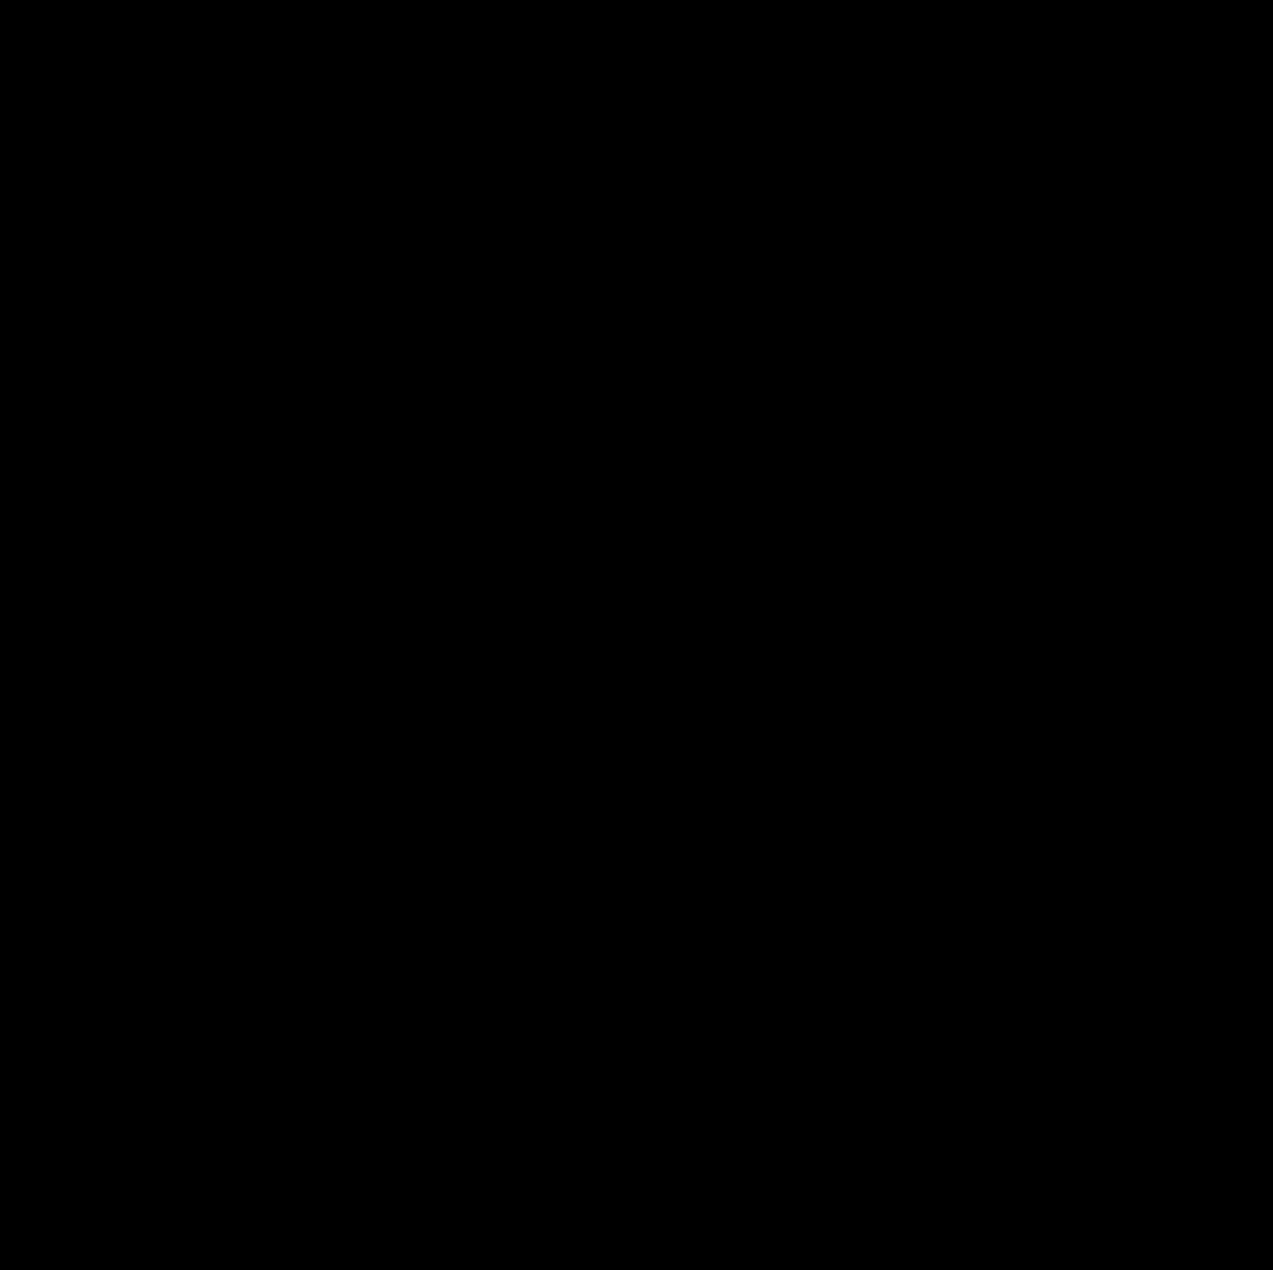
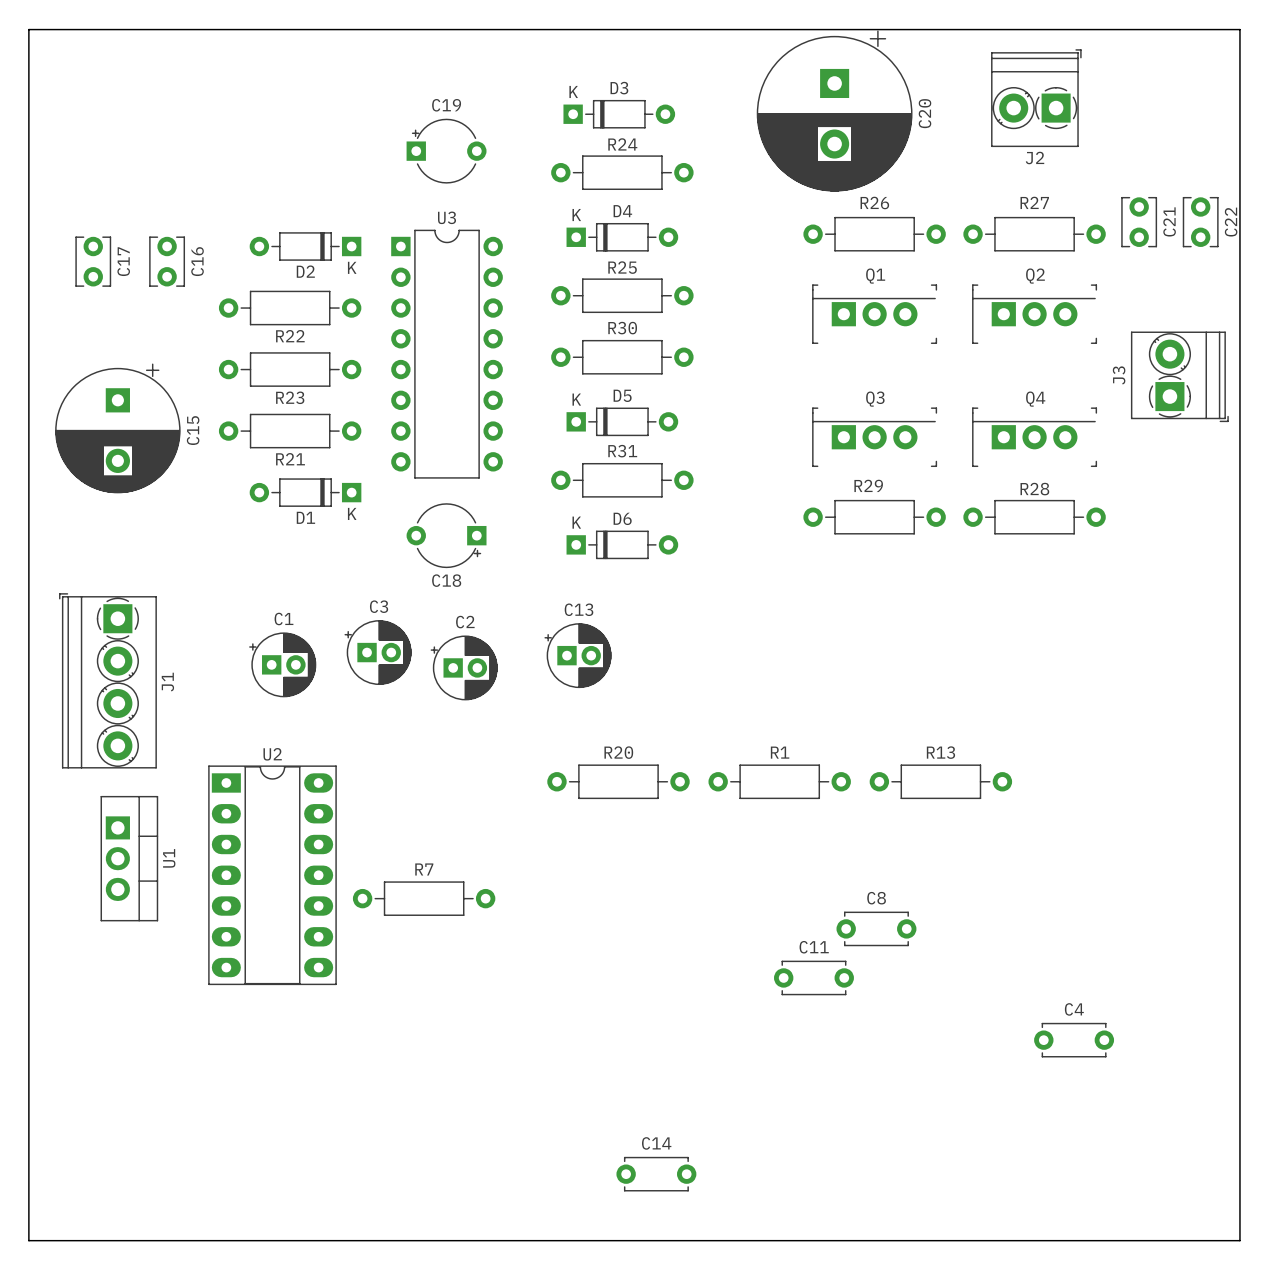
board edge: none -> (28, 29) (1239, 29) (1239, 1240) (28, 1240) (28, 29)
J2: none -> (1036, 98)
C20: none -> (834, 111)
D3: none -> (619, 114)
C19: none -> (446, 151)
R24: none -> (622, 172)
C21: none -> (1139, 222)
C22: none -> (1200, 222)
R26: none -> (874, 234)
R27: none -> (1034, 234)
D4: none -> (622, 237)
D2: none -> (305, 246)
C17: none -> (93, 261)
C16: none -> (167, 261)
R25: none -> (622, 295)
R22: none -> (290, 308)
Q1: none -> (874, 314)
Q2: none -> (1034, 314)
U3: none -> (447, 354)
R30: none -> (622, 357)
R23: none -> (290, 369)
J3: none -> (1179, 376)
D5: none -> (622, 421)
C15: none -> (117, 428)
R21: none -> (290, 431)
Q3: none -> (874, 437)
Q4: none -> (1034, 437)
R31: none -> (622, 480)
D1: none -> (305, 492)
R29: none -> (874, 517)
R28: none -> (1034, 517)
C18: none -> (446, 535)
D6: none -> (622, 544)
C3: none -> (378, 652)
C13: none -> (577, 655)
C1: none -> (282, 664)
C2: none -> (464, 667)
J1: none -> (107, 680)
R20: none -> (618, 781)
R1: none -> (779, 781)
R13: none -> (940, 781)
U1: none -> (129, 858)
U2: none -> (272, 875)
R7: none -> (424, 898)
C8: none -> (876, 928)
C11: none -> (813, 977)
C4: none -> (1074, 1040)
C14: none -> (656, 1174)

